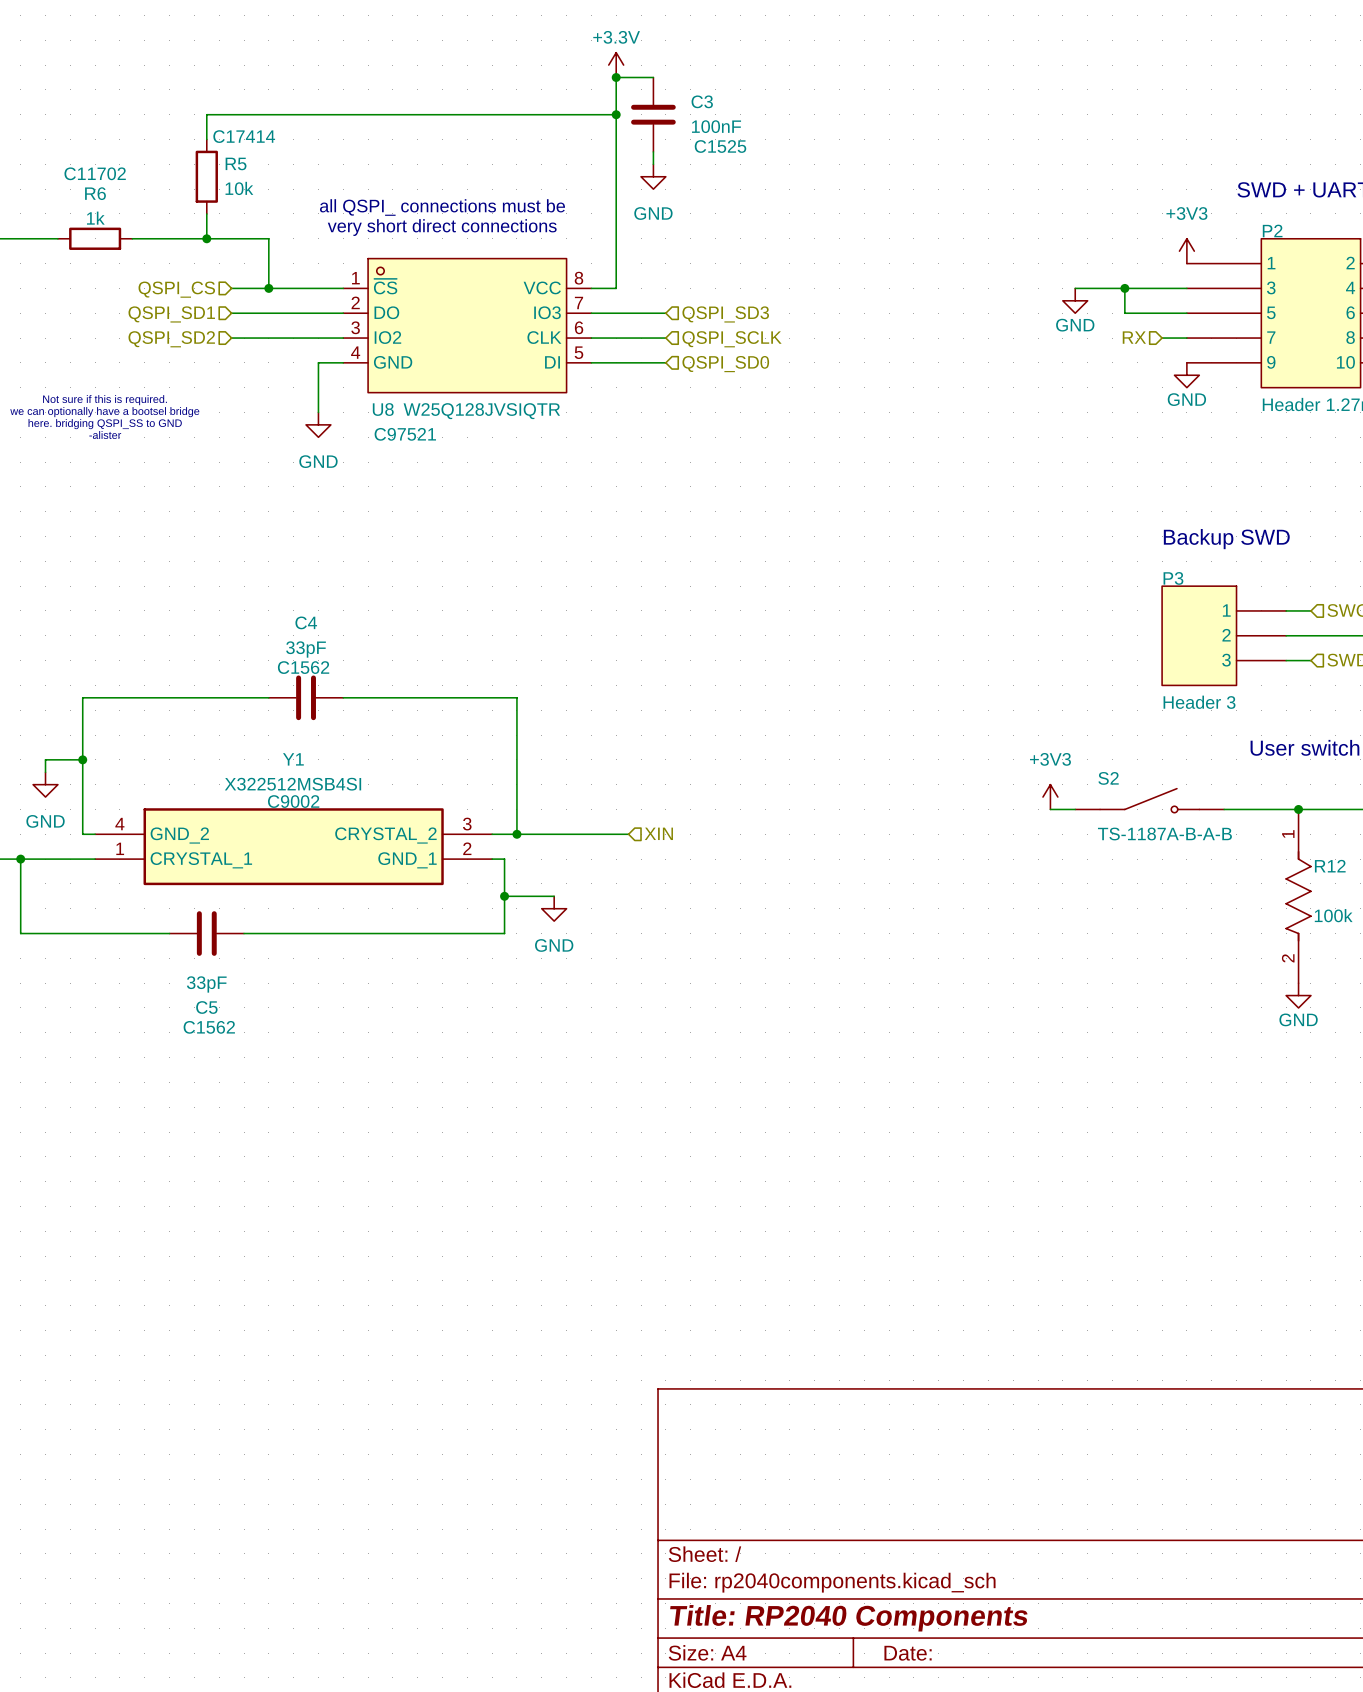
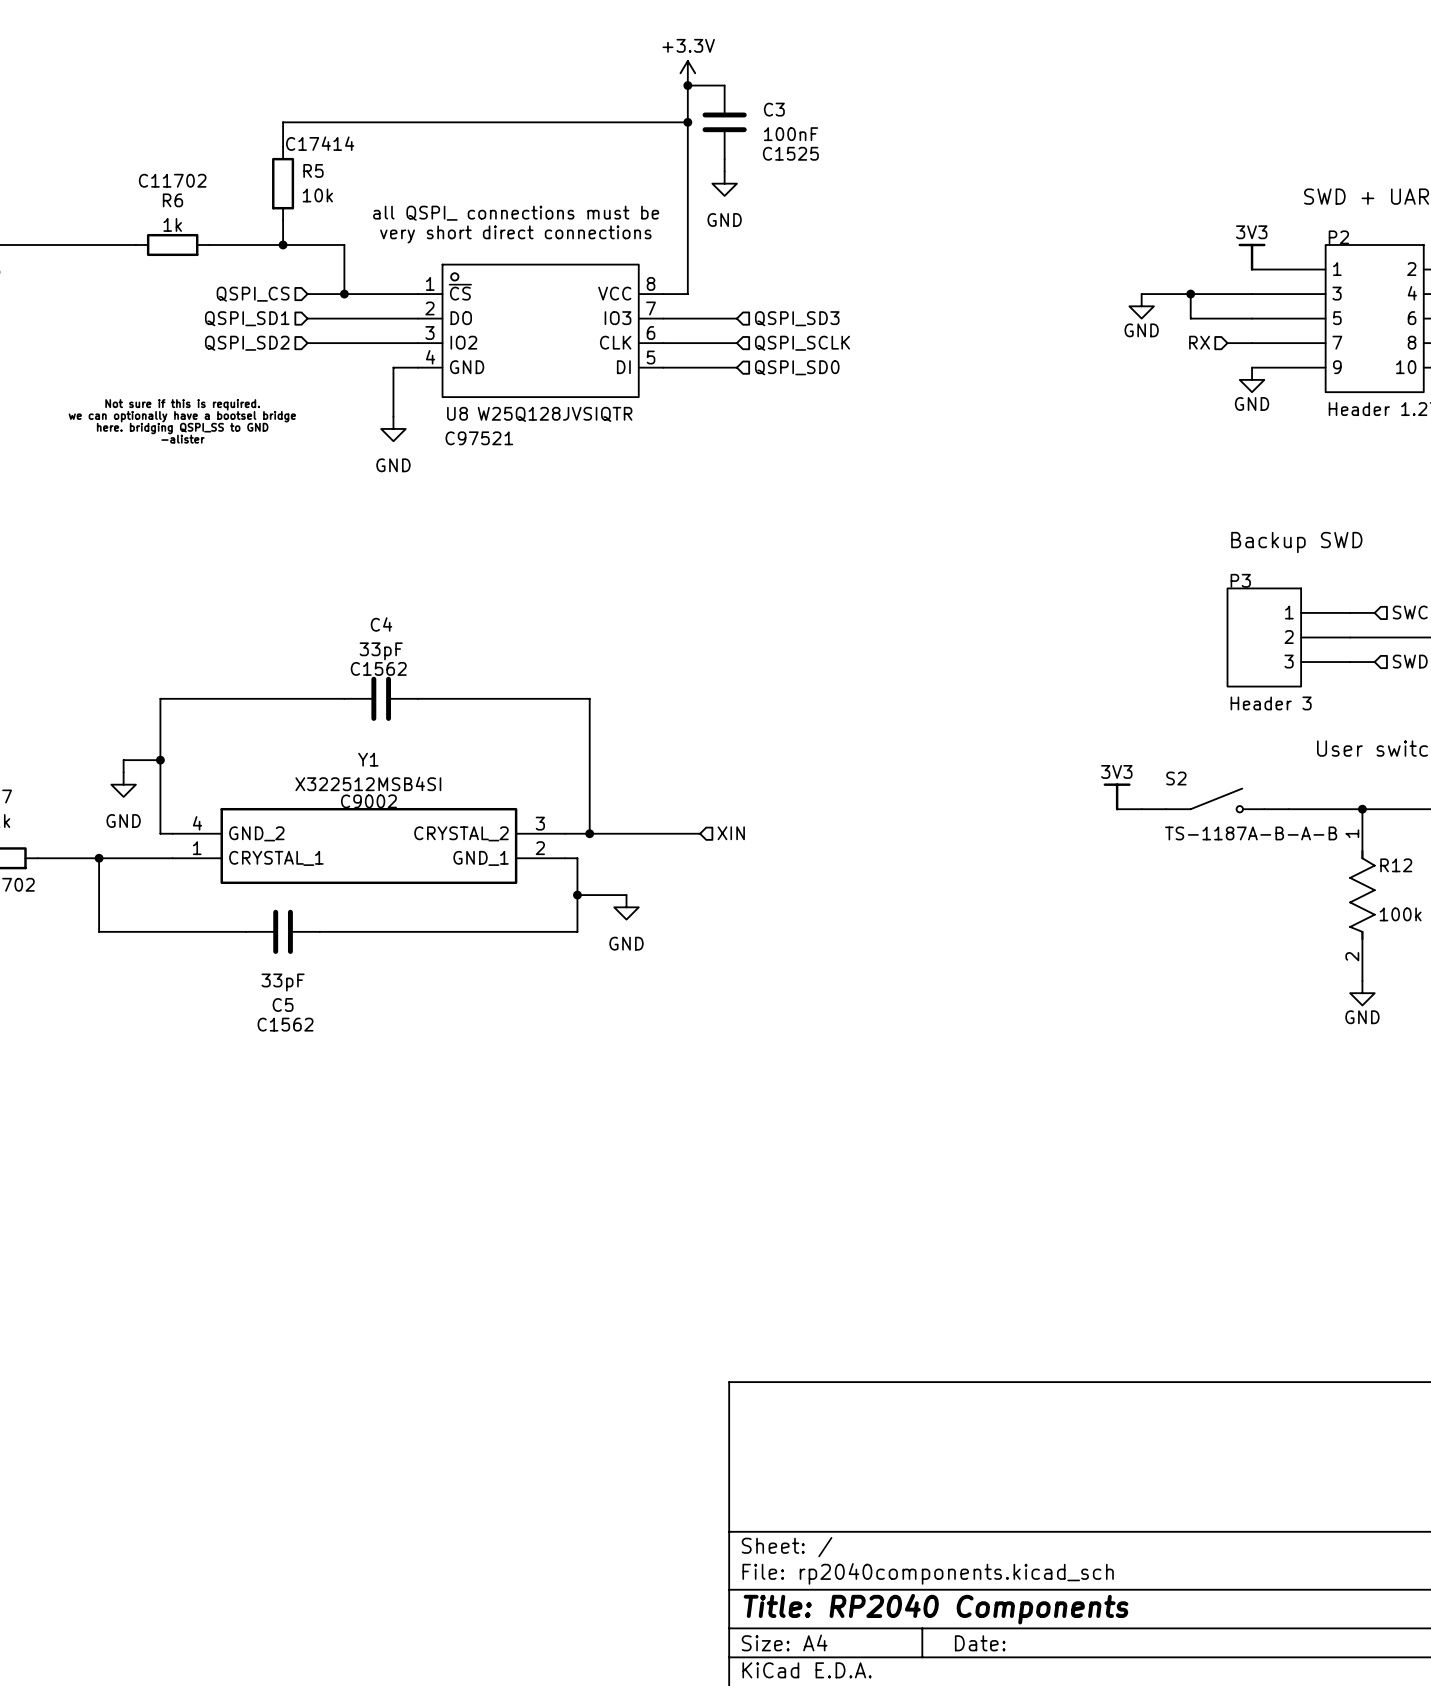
power symbol: +3V3 (1186, 251) -> 3V3 (1252, 257)
power symbol: +3V3 (1050, 797) -> 3V3 (1117, 796)

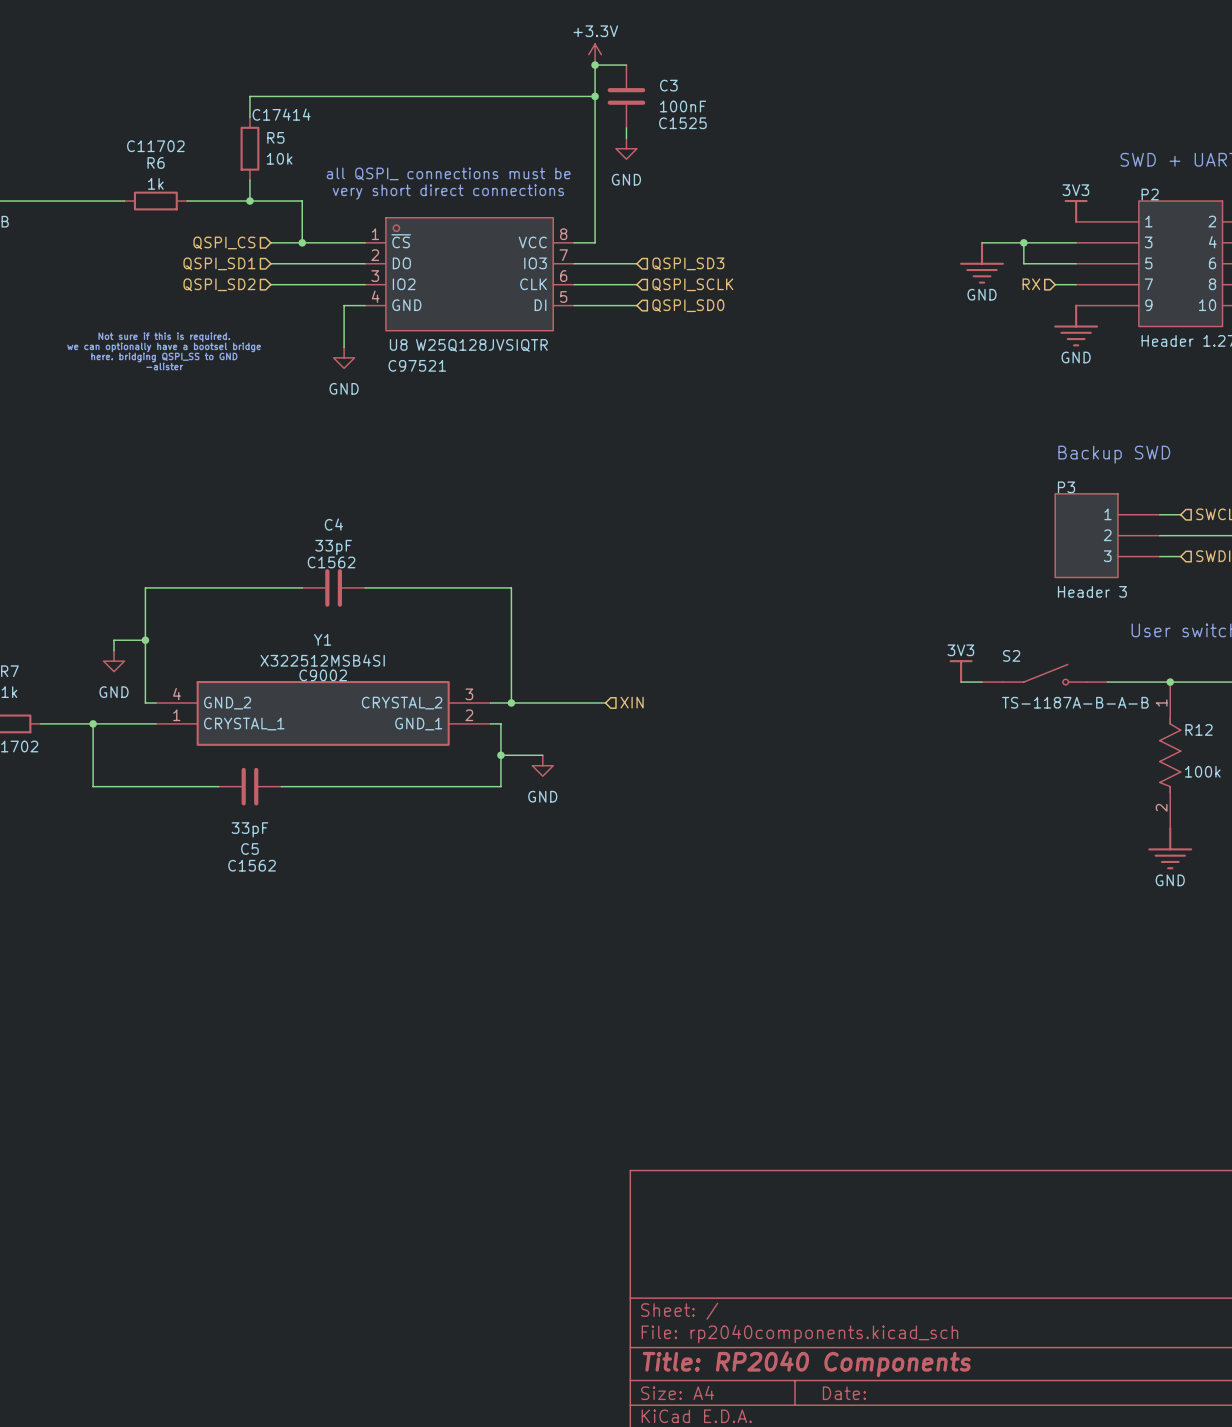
power symbol: GND (1141, 306) -> none
power symbol: none -> GND (982, 262)
power symbol: GND (1252, 379) -> none
power symbol: none -> GND (1076, 325)
power symbol: GND (1362, 993) -> none
power symbol: none -> GND (1170, 848)

